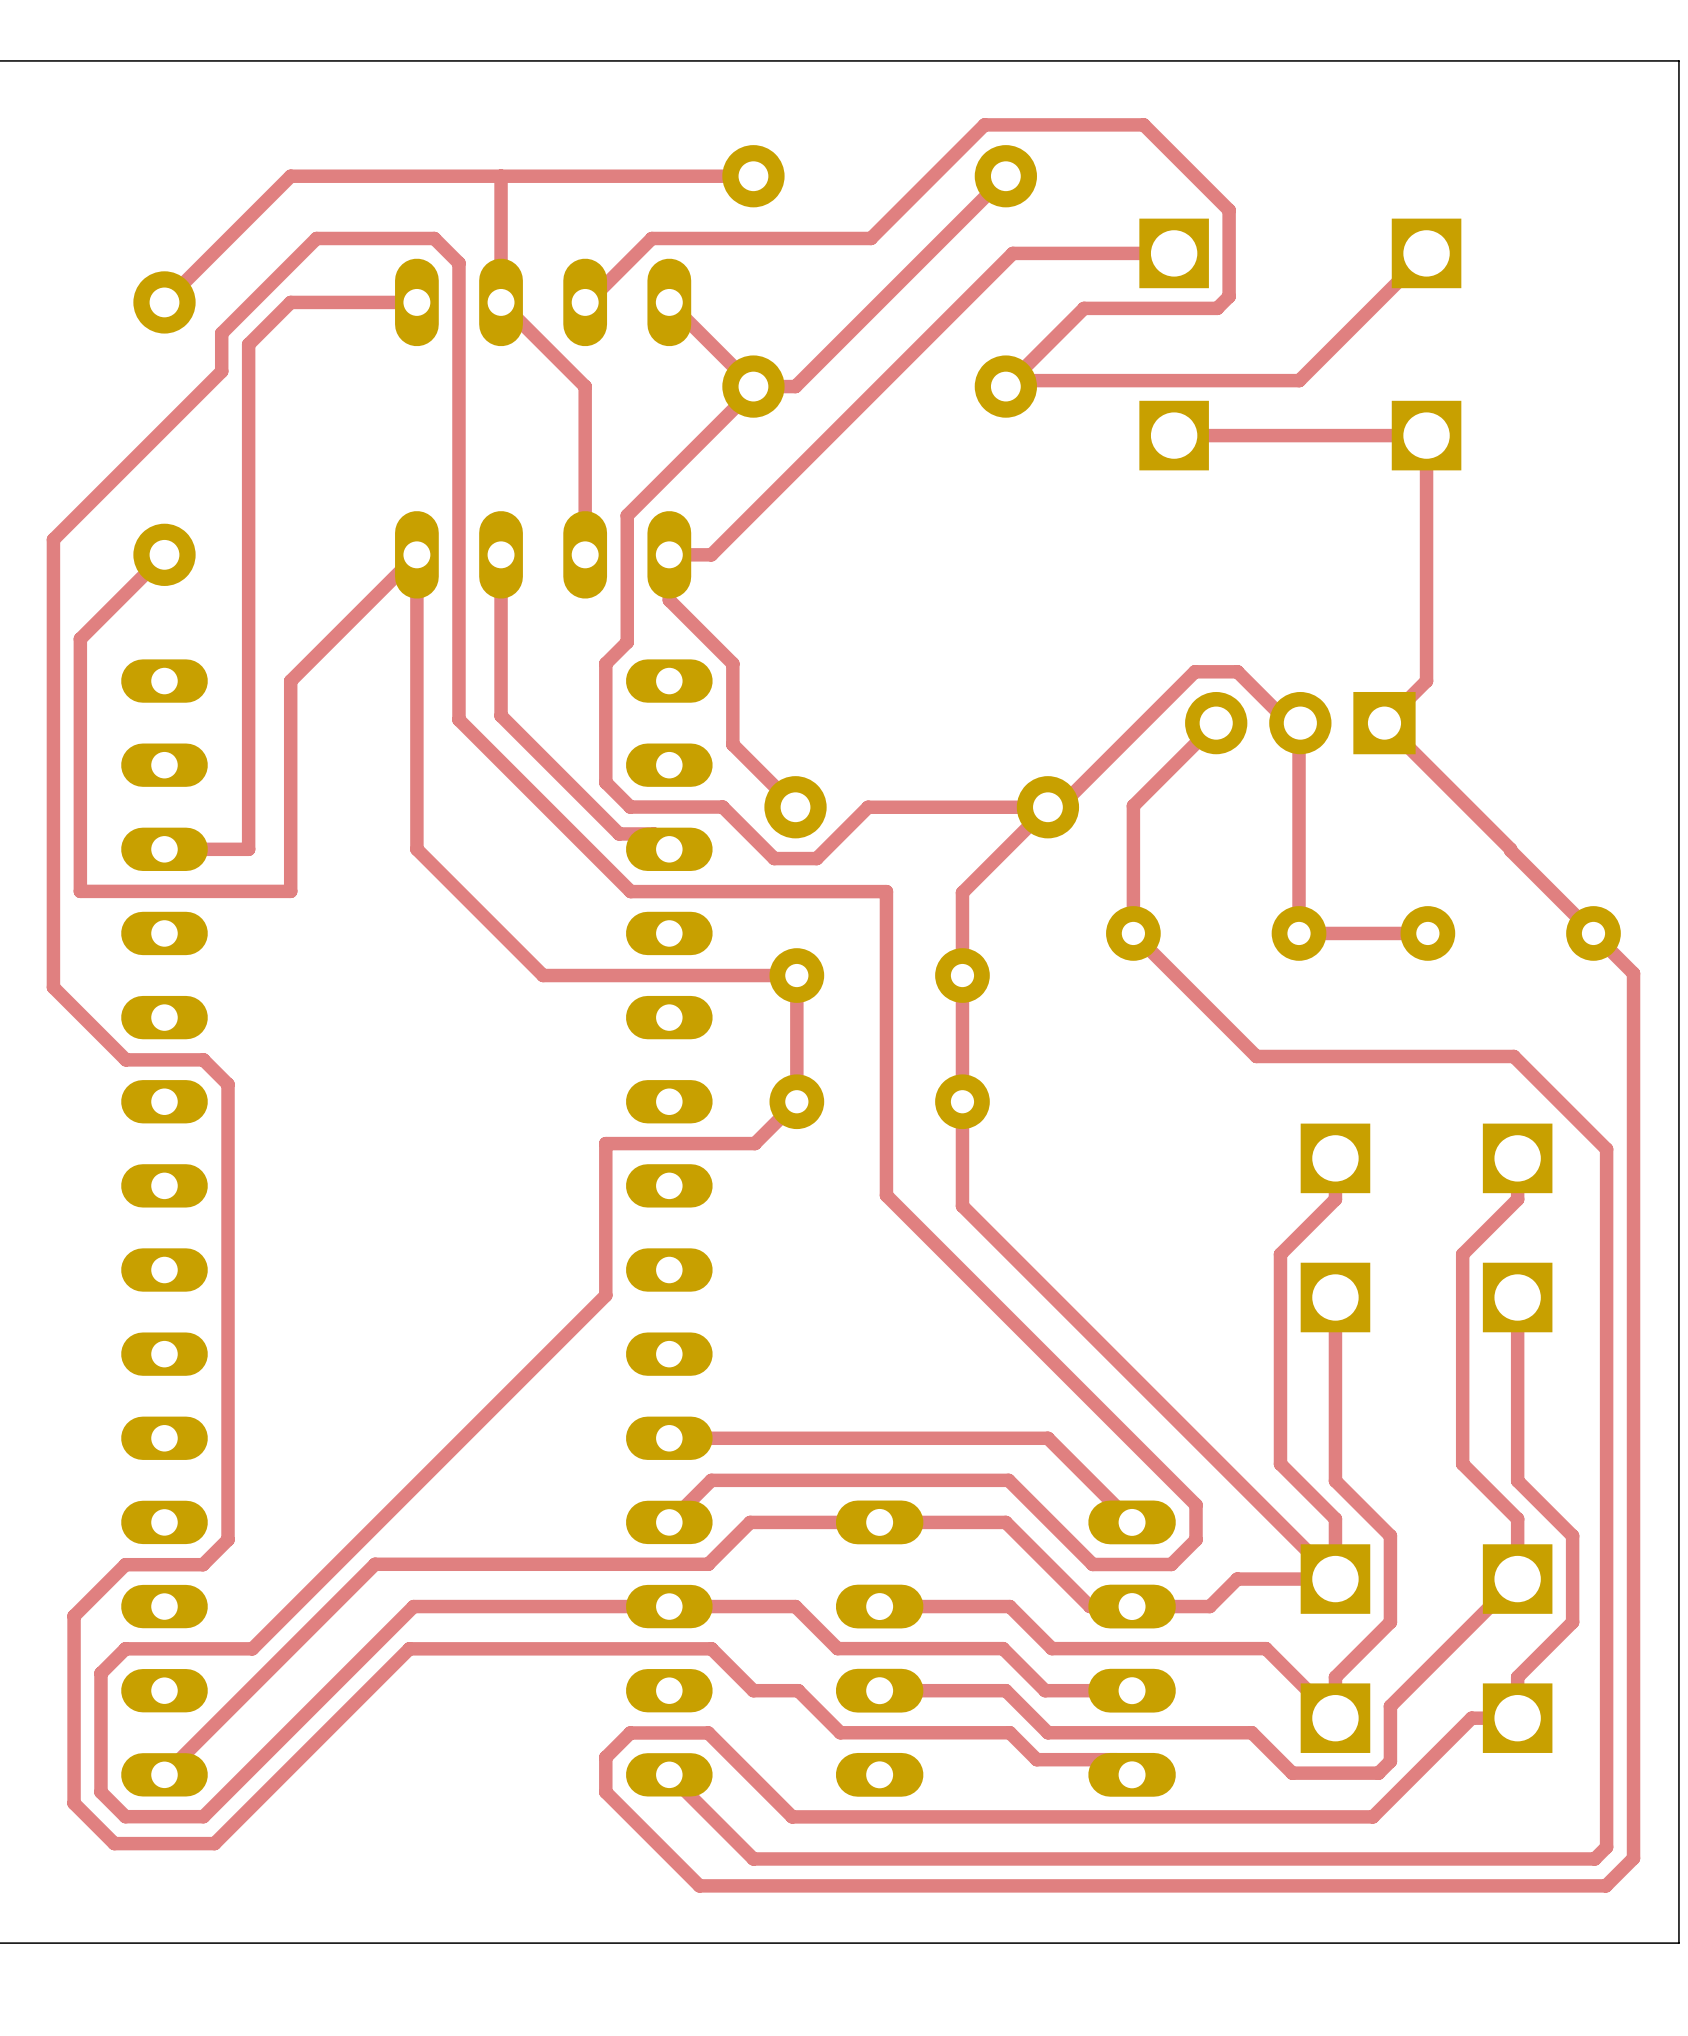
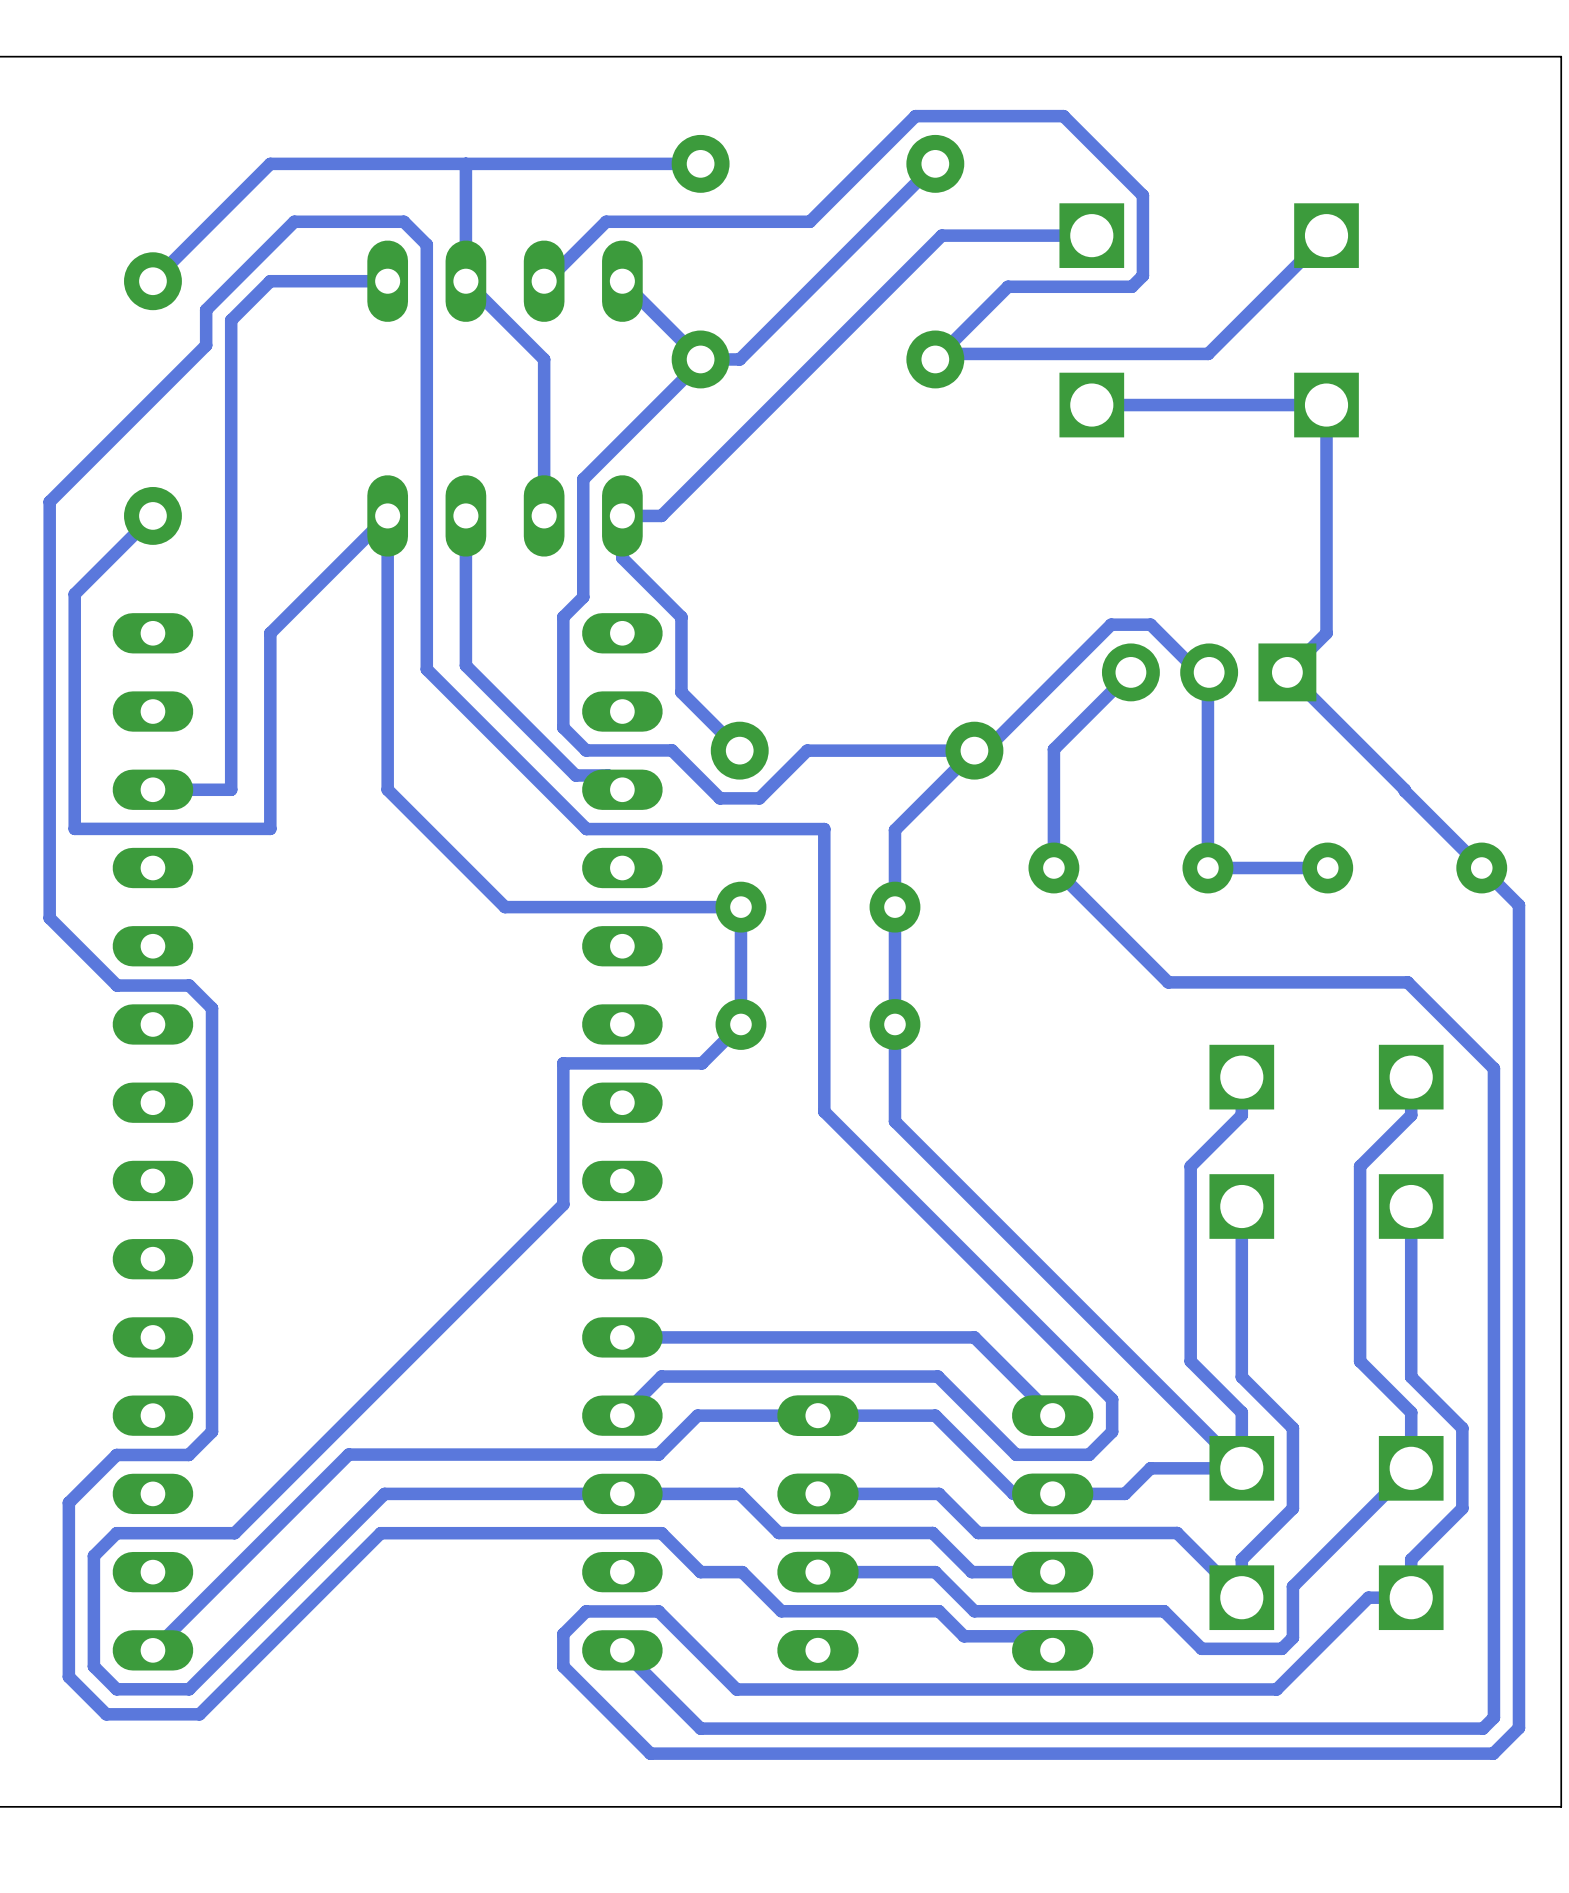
top track: (501, 176) (501, 302) (585, 386) (585, 554) -> none
bottom track: none -> (465, 163) (465, 281) (544, 359) (544, 515)
top track: (753, 176) (290, 176) (164, 302) -> none
bottom track: none -> (700, 163) (270, 163) (152, 281)
top track: (1005, 176) (795, 386) (753, 386) -> none
bottom track: none -> (935, 163) (739, 359) (700, 359)
top track: (1174, 253) (1012, 253) (711, 554) (669, 554) (669, 600) (732, 663) (732, 744) (795, 807) -> none
bottom track: none -> (1091, 235) (941, 235) (661, 515) (622, 515) (622, 558) (681, 617) (681, 692) (739, 750)
top track: (1426, 253) (1299, 380) (1011, 380) -> none
bottom track: none -> (1326, 235) (1208, 353) (940, 353)
top track: (416, 302) (290, 302) (248, 344) (248, 849) (164, 849) -> none
bottom track: none -> (387, 281) (270, 281) (231, 320) (231, 789) (152, 789)
top track: (585, 302) (587, 302) (651, 238) (871, 238) (984, 124) (1143, 124) (1229, 210) (1229, 296) (1217, 308) (1084, 308) (1005, 386) -> none
bottom track: none -> (544, 281) (546, 281) (606, 221) (809, 221) (915, 116) (1063, 116) (1142, 195) (1142, 275) (1131, 286) (1008, 286) (935, 359)
top track: (669, 302) (753, 386) -> none
bottom track: none -> (622, 281) (700, 359)
top track: (753, 386) (753, 389) (627, 515) (627, 642) (605, 663) (605, 782) (630, 807) (722, 807) (774, 858) (816, 858) (868, 807) (1059, 807) (1194, 671) (1237, 671) (1288, 723) (1300, 723) (1299, 933) (1427, 933) -> none
bottom track: none -> (700, 359) (700, 362) (583, 479) (583, 597) (563, 617) (563, 727) (586, 750) (672, 750) (719, 798) (759, 798) (807, 750) (985, 750) (1111, 624) (1150, 624) (1198, 672) (1209, 672) (1207, 868) (1327, 868)
top track: (1174, 435) (1426, 435) (1426, 681) (1384, 723) (1633, 973) (1633, 1858) (1605, 1885) (699, 1885) (605, 1792) (605, 1757) (630, 1732) (708, 1732) (792, 1816) (1372, 1816) (1471, 1718) (1517, 1718) (1517, 1677) (1572, 1622) (1572, 1535) (1517, 1480) (1517, 1297) -> none
bottom track: none -> (1091, 405) (1326, 405) (1326, 633) (1287, 672) (1518, 905) (1518, 1728) (1493, 1753) (650, 1753) (563, 1666) (563, 1634) (586, 1611) (658, 1611) (736, 1689) (1276, 1689) (1368, 1597) (1411, 1597) (1411, 1559) (1462, 1508) (1462, 1428) (1411, 1377) (1411, 1206)
top track: (164, 554) (80, 638) (80, 891) (290, 891) (290, 681) (416, 554) (416, 849) (543, 975) (796, 975) (796, 1101) (754, 1143) (605, 1143) (605, 1295) (252, 1648) (125, 1648) (100, 1673) (100, 1792) (125, 1816) (203, 1816) (413, 1606) (795, 1606) (837, 1648) (1003, 1648) (1045, 1690) (1132, 1690) -> none
bottom track: none -> (152, 515) (74, 594) (74, 828) (270, 828) (270, 633) (387, 515) (387, 789) (505, 907) (740, 907) (740, 1024) (702, 1063) (563, 1063) (563, 1204) (234, 1533) (116, 1533) (93, 1556) (93, 1666) (116, 1689) (189, 1689) (384, 1493) (739, 1493) (778, 1533) (932, 1533) (971, 1572) (1052, 1572)
top track: (501, 554) (501, 715) (619, 833) (653, 833) (669, 849) -> none
bottom track: none -> (465, 515) (465, 665) (575, 775) (608, 775) (622, 789)
top track: (1216, 723) (1133, 805) (1133, 933) (1256, 1056) (1513, 1056) (1606, 1149) (1606, 1847) (1594, 1858) (753, 1858) (669, 1774) -> none
bottom track: none -> (1130, 672) (1053, 749) (1053, 868) (1168, 982) (1407, 982) (1493, 1068) (1493, 1717) (1482, 1728) (700, 1728) (622, 1650)
top track: (1047, 807) (962, 892) (962, 1206) (1335, 1579) -> none
bottom track: none -> (974, 750) (894, 830) (894, 1121) (1241, 1468)
top track: (1335, 1158) (1335, 1199) (1280, 1254) (1280, 1464) (1335, 1519) (1335, 1579) -> none
bottom track: none -> (1241, 1077) (1241, 1115) (1190, 1166) (1190, 1361) (1241, 1412) (1241, 1468)
top track: (1517, 1158) (1517, 1199) (1462, 1254) (1462, 1464) (1517, 1519) (1517, 1579) (1390, 1706) (1390, 1761) (1378, 1773) (1292, 1773) (1251, 1732) (1047, 1732) (1005, 1690) (879, 1690) -> none
bottom track: none -> (1411, 1077) (1411, 1115) (1360, 1166) (1360, 1361) (1411, 1412) (1411, 1468) (1292, 1586) (1292, 1637) (1281, 1648) (1201, 1648) (1164, 1611) (974, 1611) (935, 1572) (817, 1572)
top track: (1335, 1297) (1335, 1480) (1390, 1535) (1390, 1622) (1335, 1677) (1335, 1718) (1265, 1648) (1051, 1648) (1009, 1606) (879, 1606) -> none
bottom track: none -> (1241, 1206) (1241, 1377) (1292, 1428) (1292, 1508) (1241, 1559) (1241, 1597) (1177, 1533) (978, 1533) (939, 1493) (817, 1493)
top track: (669, 1438) (1047, 1438) (1132, 1522) -> none
bottom track: none -> (622, 1337) (974, 1337) (1052, 1415)
top track: (669, 1522) (711, 1480) (1008, 1480) (1092, 1564) (1171, 1564) (1196, 1539) (1196, 1504) (886, 1195) (886, 891) (630, 891) (458, 719) (458, 263) (434, 238) (316, 238) (221, 333) (221, 371) (53, 539) (53, 987) (125, 1059) (203, 1059) (228, 1084) (228, 1539) (203, 1564) (125, 1564) (74, 1616) (74, 1803) (114, 1843) (214, 1843) (409, 1648) (711, 1648) (753, 1690) (798, 1690) (840, 1732) (1009, 1732) (1036, 1759) (1116, 1759) (1132, 1774) -> none
bottom track: none -> (622, 1415) (661, 1376) (937, 1376) (1016, 1454) (1089, 1454) (1112, 1431) (1112, 1399) (824, 1111) (824, 829) (586, 829) (426, 669) (426, 244) (403, 221) (294, 221) (206, 309) (206, 345) (49, 501) (49, 918) (117, 985) (189, 985) (212, 1008) (212, 1431) (188, 1454) (116, 1454) (68, 1502) (68, 1676) (106, 1714) (199, 1714) (380, 1533) (661, 1533) (700, 1572) (742, 1572) (781, 1611) (939, 1611) (964, 1636) (1038, 1636) (1052, 1650)
top track: (1335, 1579) (1237, 1579) (1209, 1606) (1090, 1606) (1005, 1522) (750, 1522) (708, 1564) (375, 1564) (164, 1774) -> none
bottom track: none -> (1241, 1468) (1150, 1468) (1125, 1493) (1013, 1493) (935, 1415) (697, 1415) (658, 1454) (348, 1454) (152, 1650)

